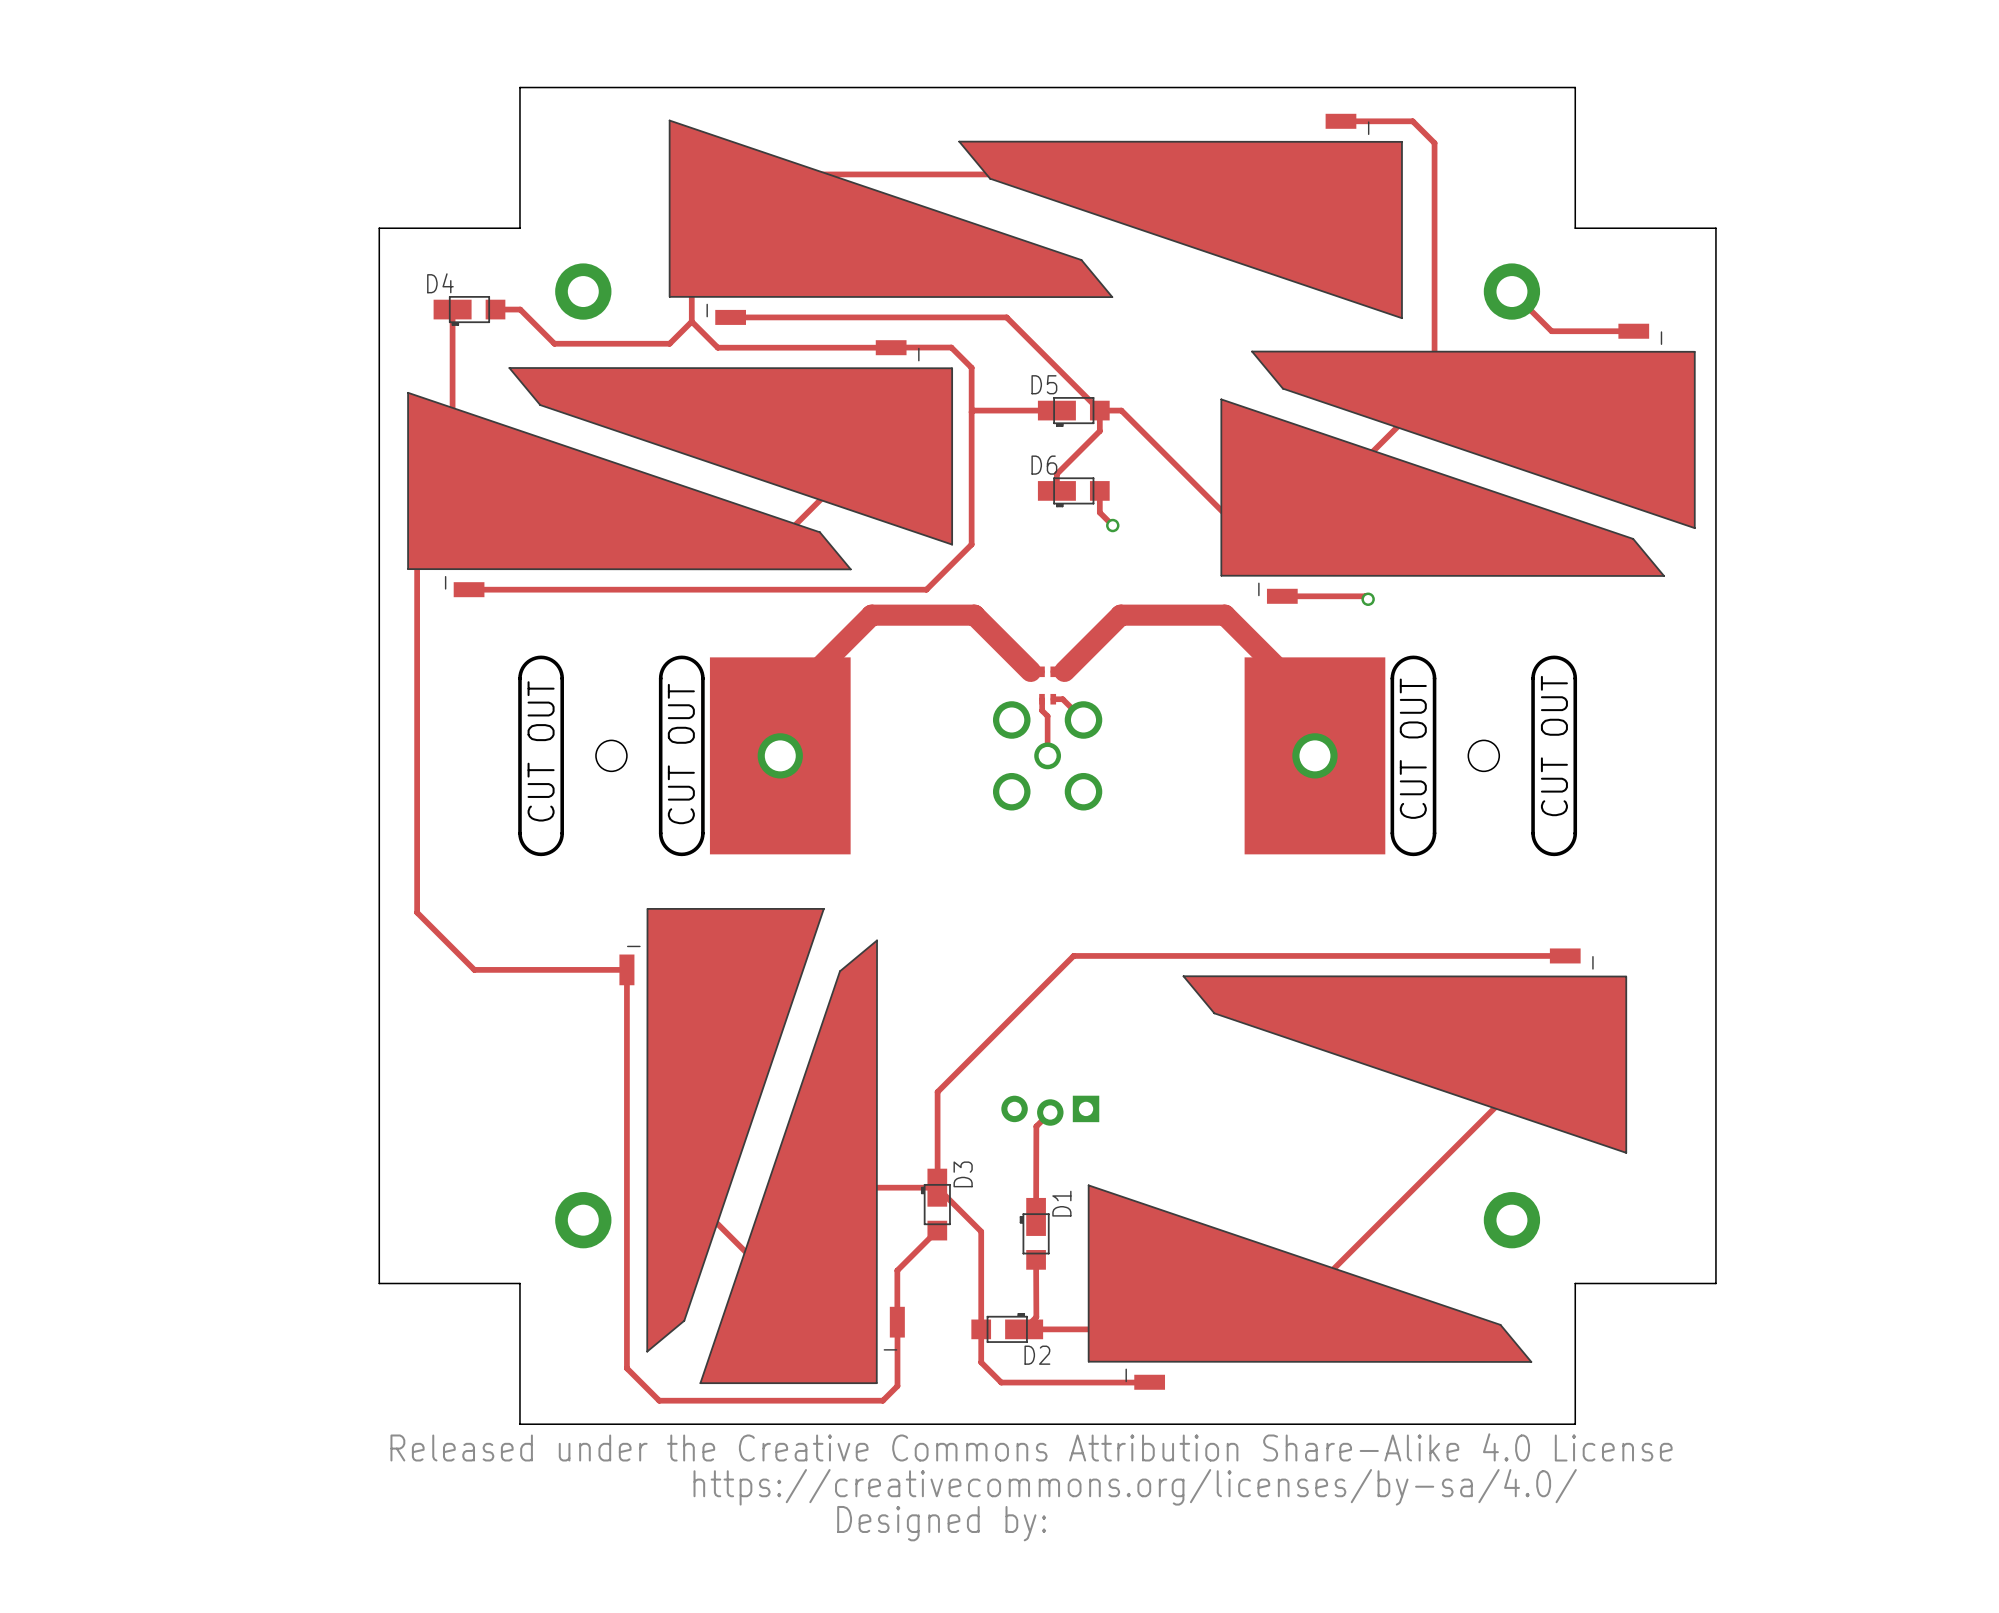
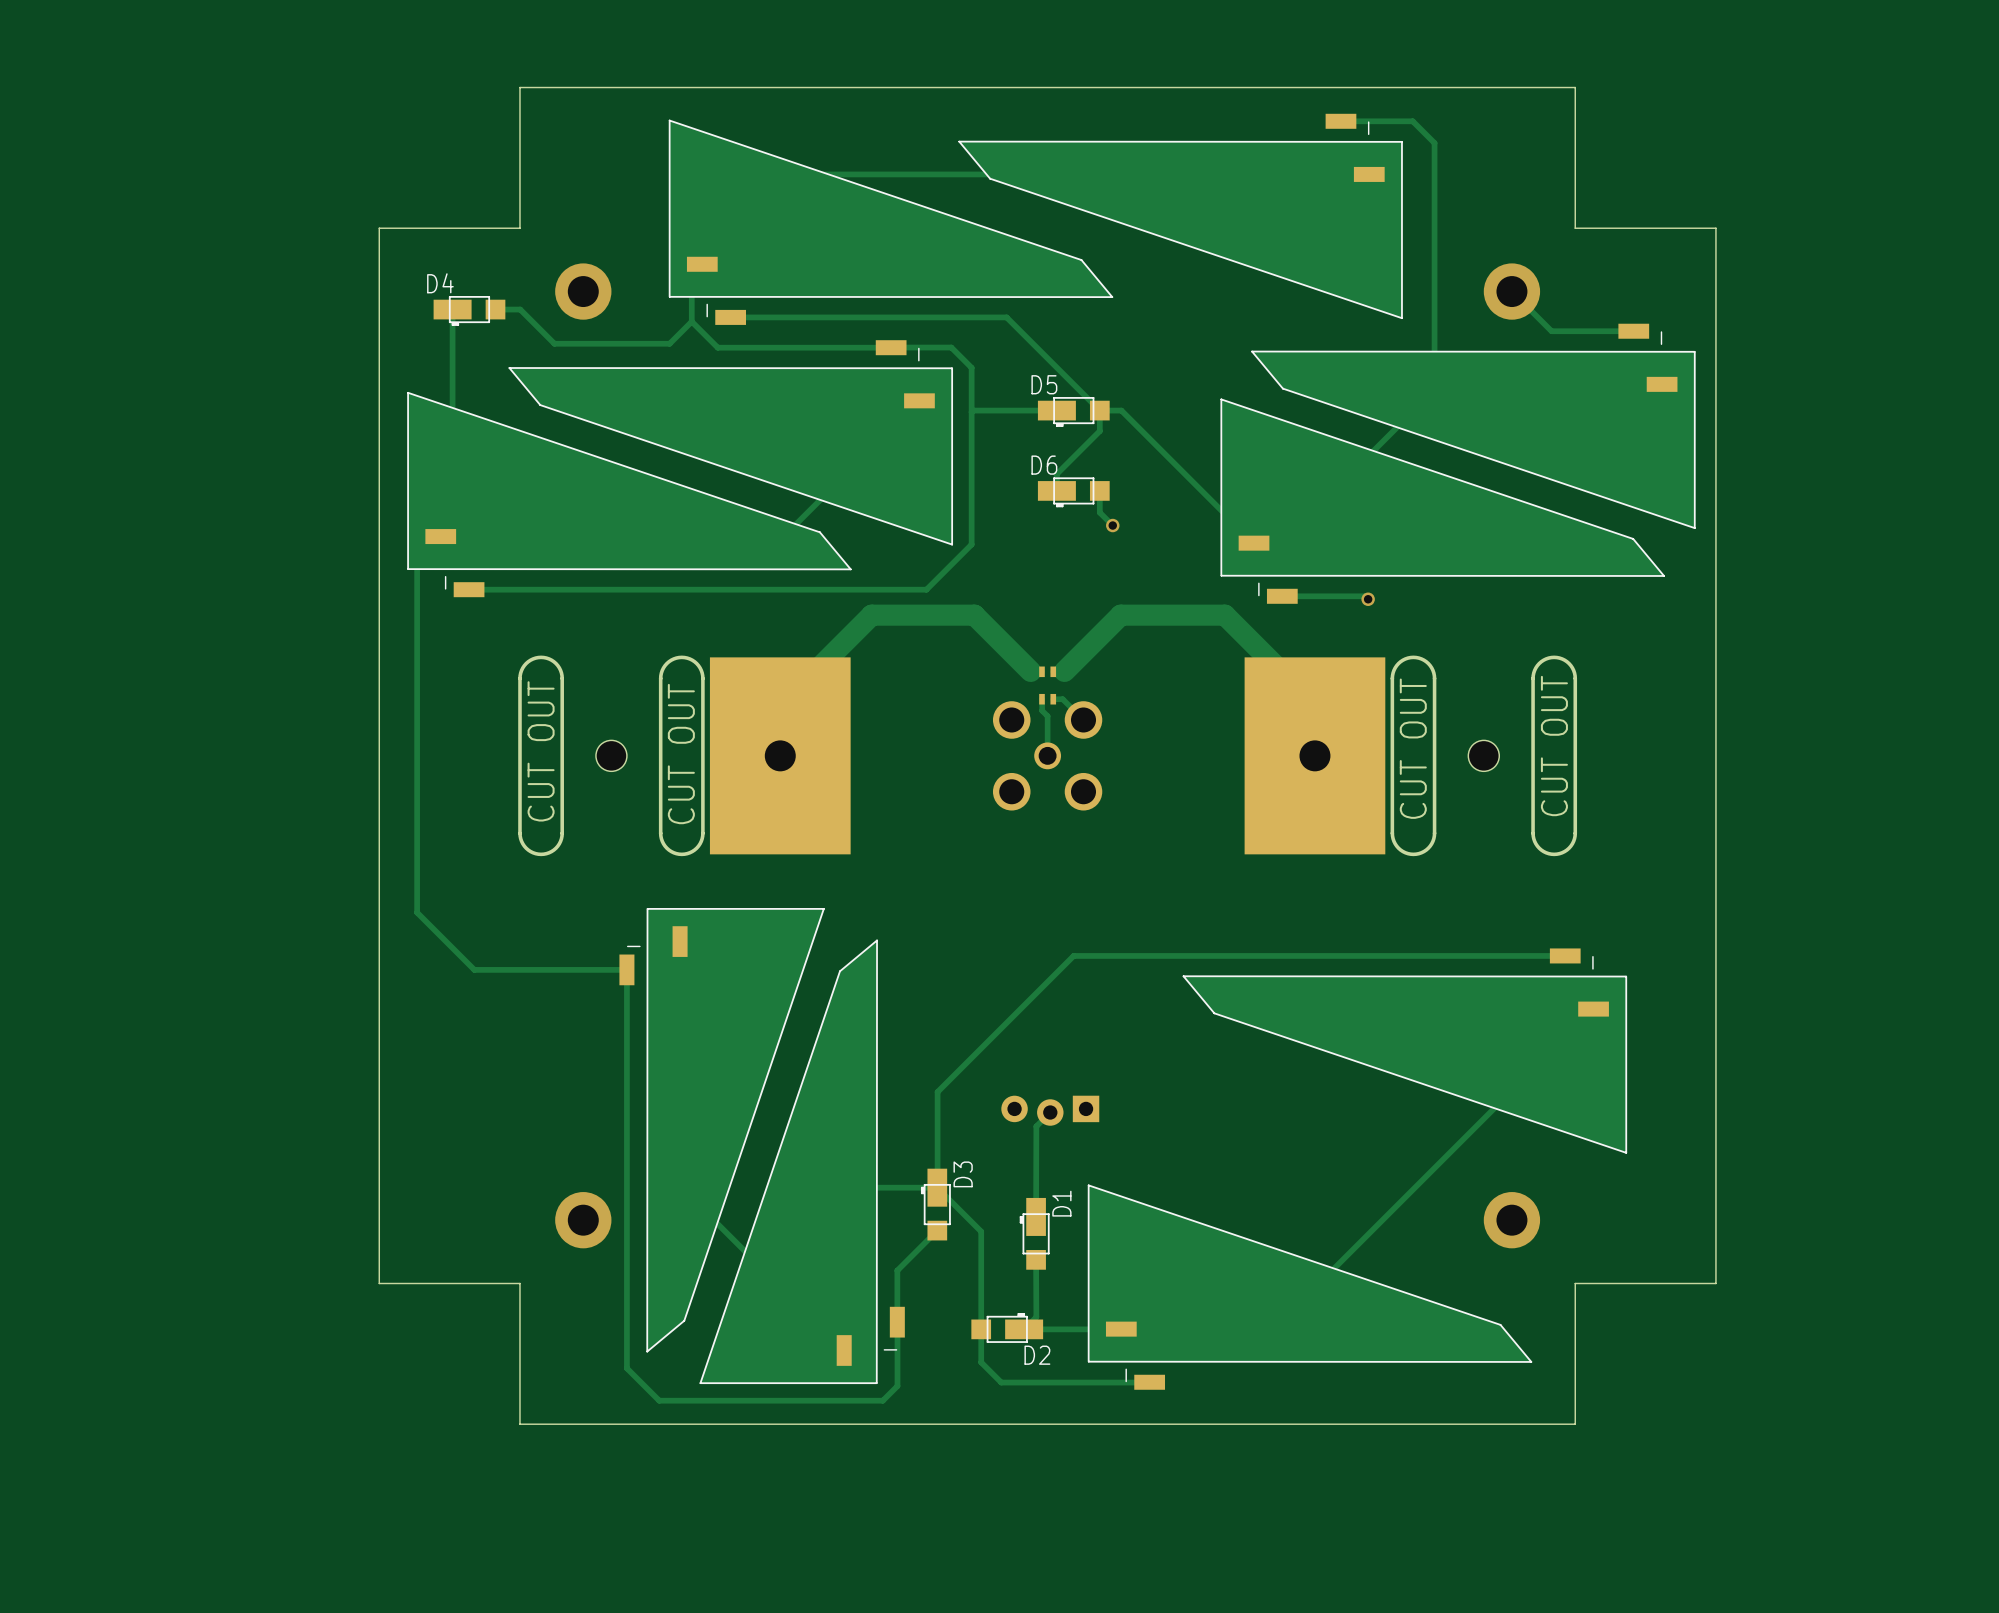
drawing: [390, 1433, 1673, 1542] -> none

